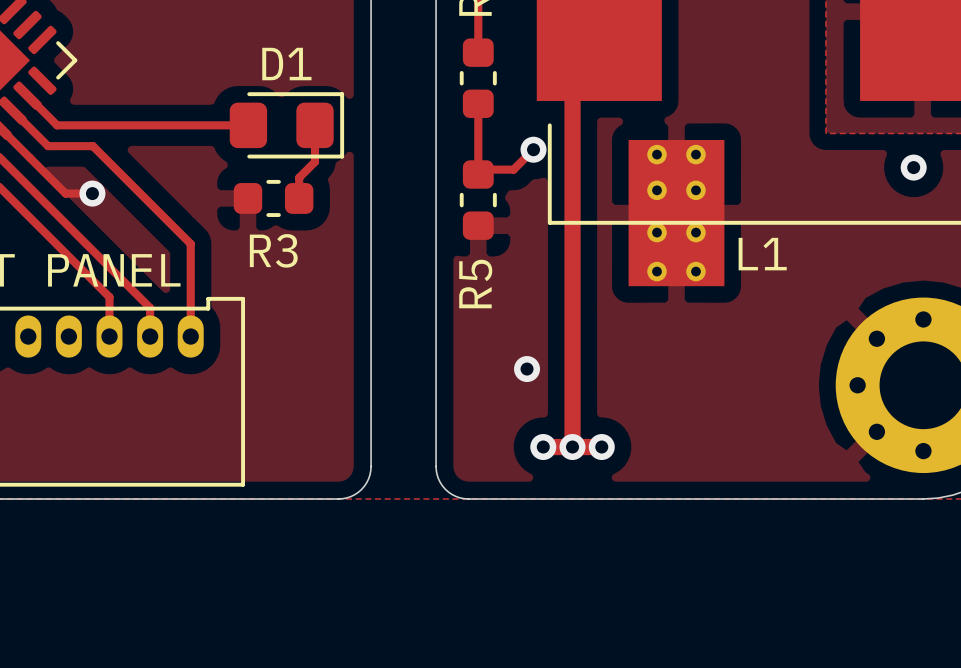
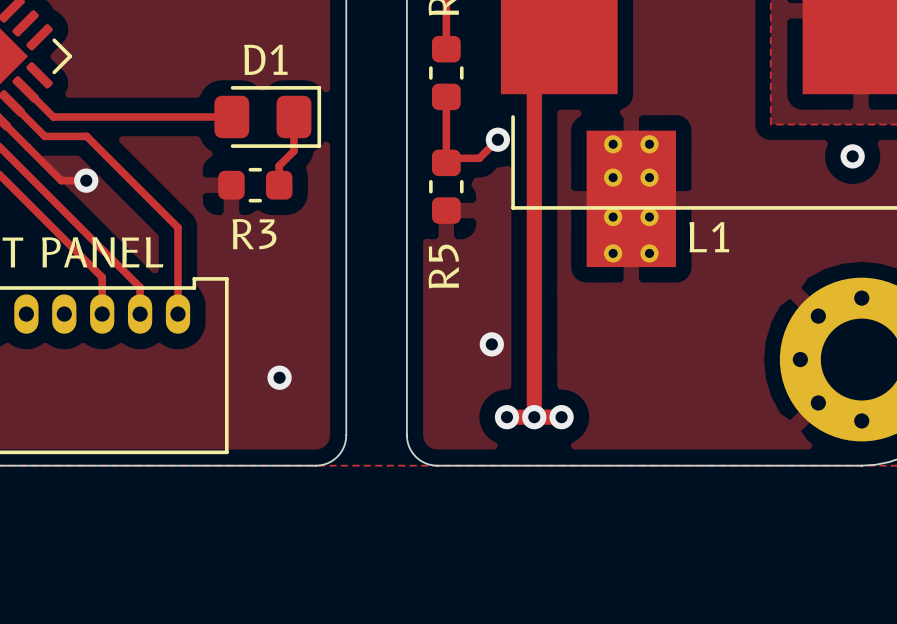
via: none -> (279, 377)

